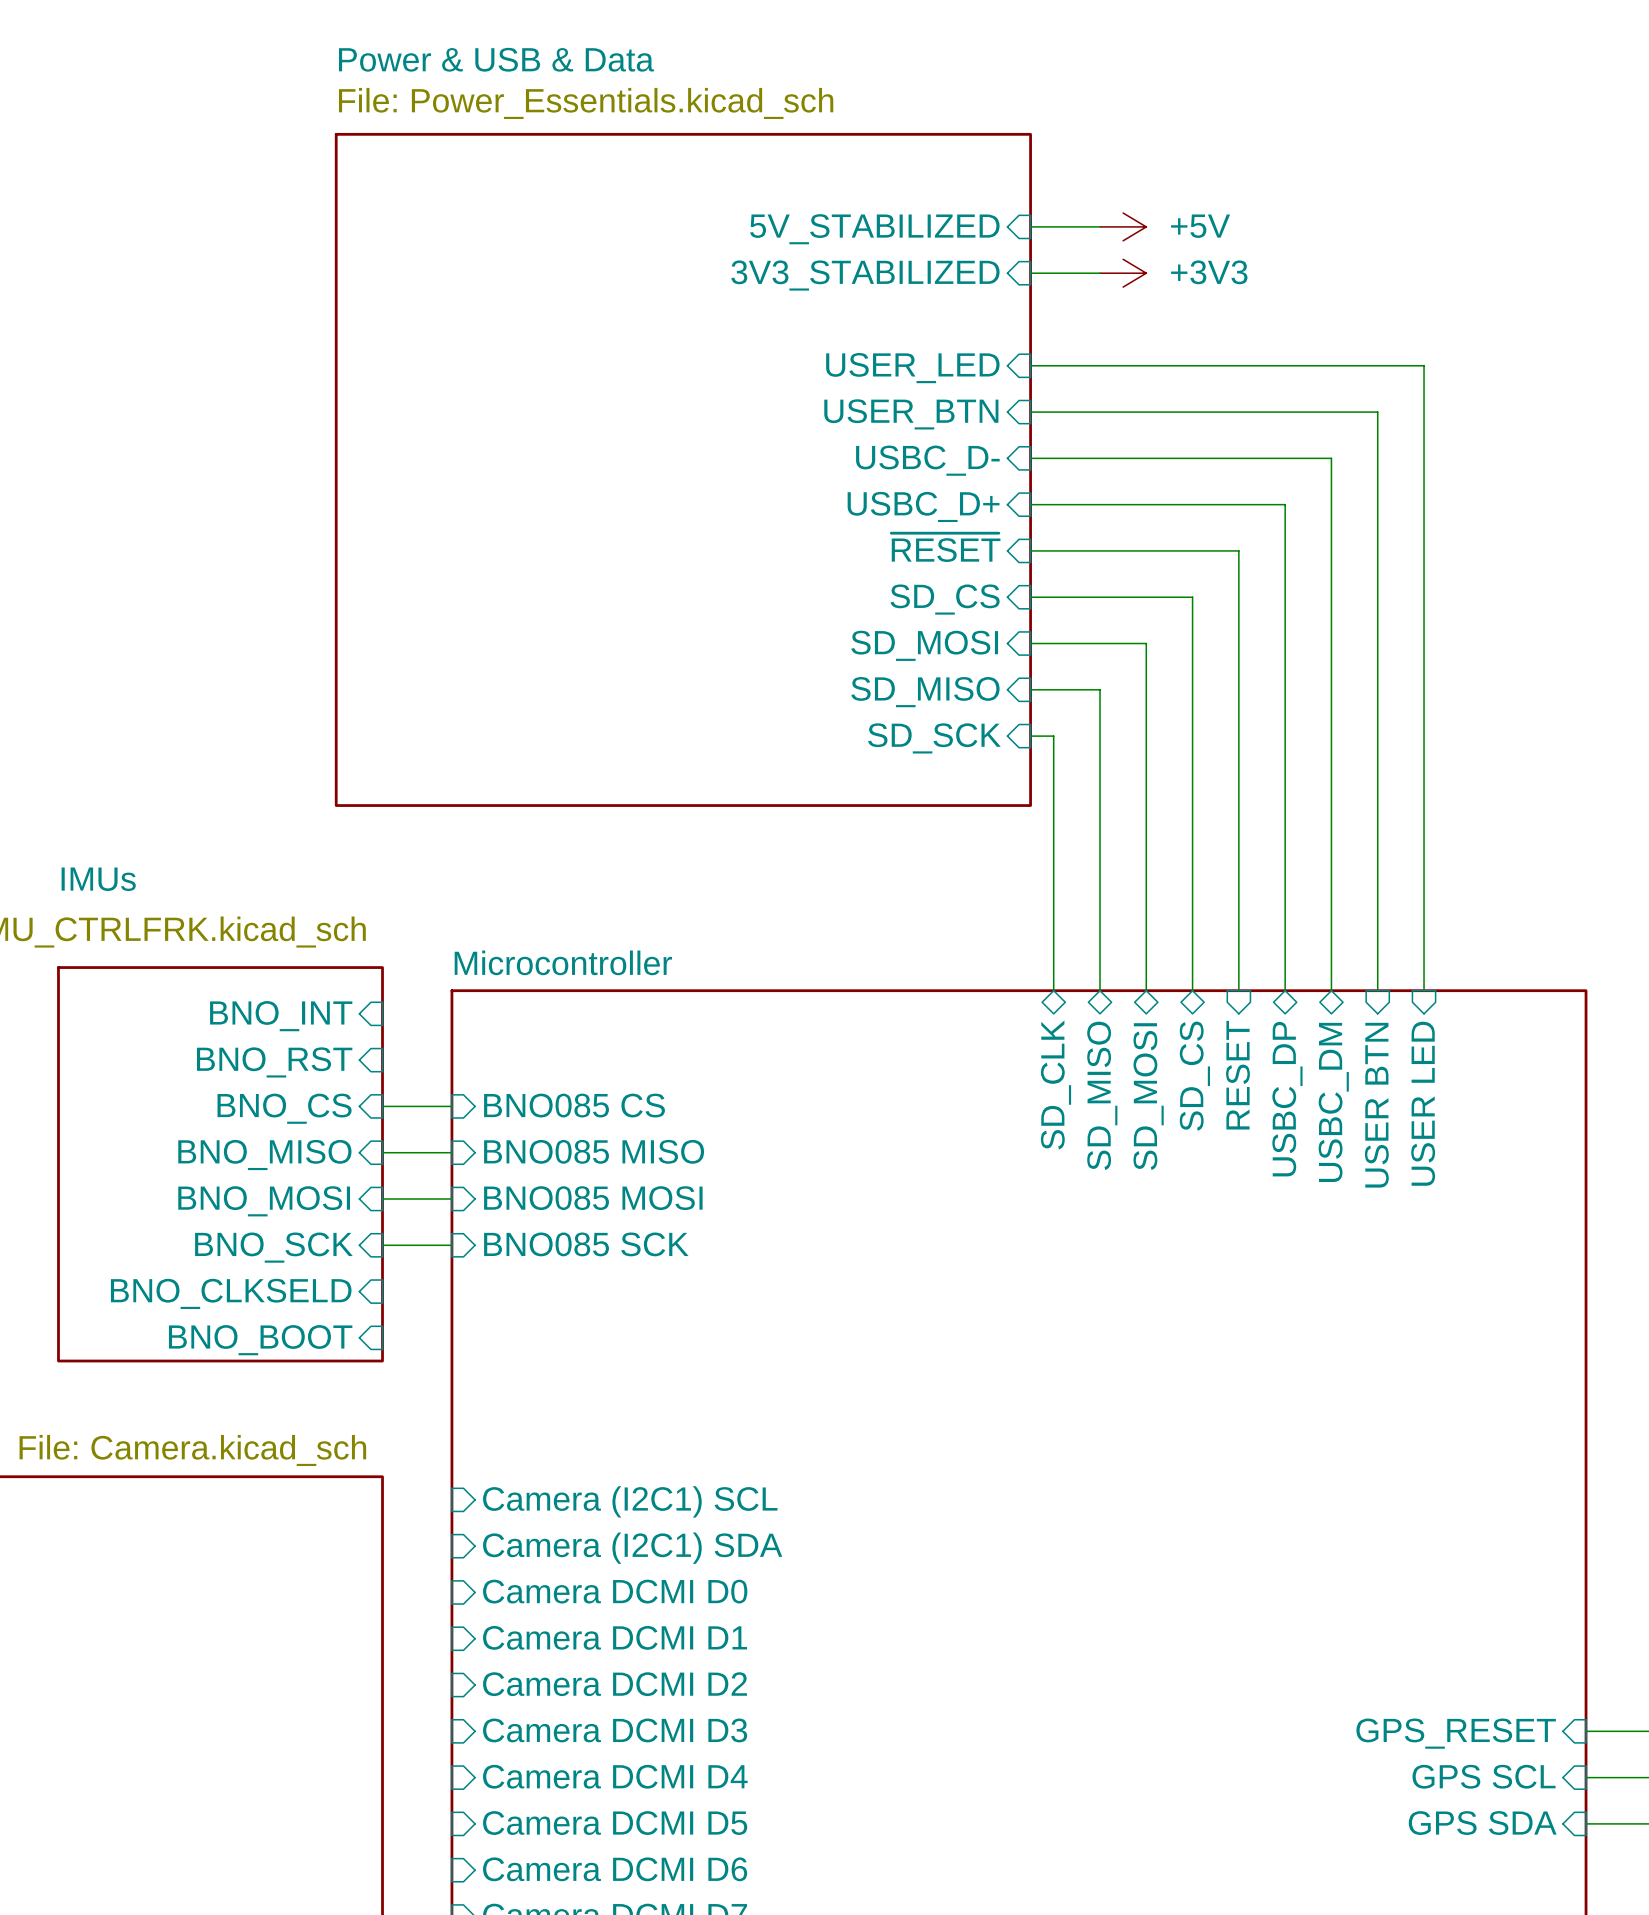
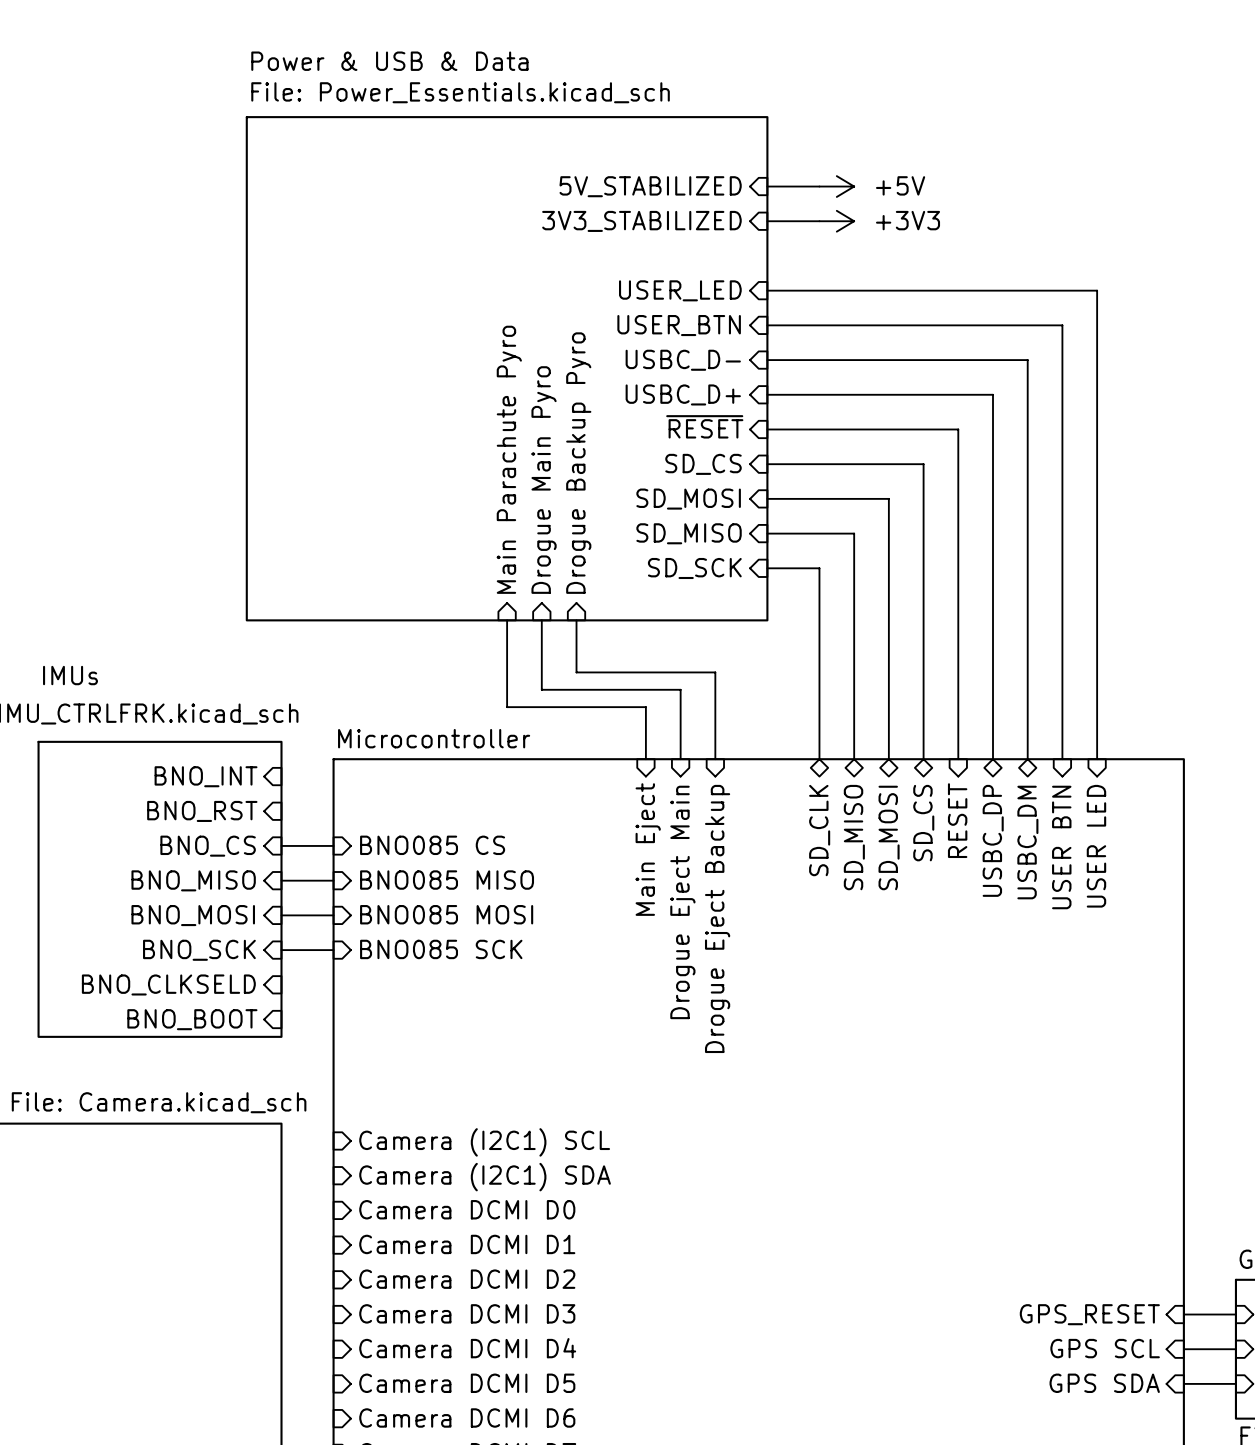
wire: (1424, 365) (1424, 412) -> (1027, 325) (1062, 325)
wire: none -> (1062, 290) (1097, 290) (1097, 759)
wire: (1377, 412) (1377, 458) -> (993, 360) (1027, 360)
wire: (1331, 458) (1331, 504) -> (958, 394) (993, 394)
wire: (1285, 504) (1285, 550) -> (923, 429) (958, 429)
wire: (1238, 550) (1238, 597) -> (888, 464) (923, 464)
wire: (1192, 597) (1192, 643) -> (854, 498) (888, 498)
sheet pin: none -> Main Parachute Pyro (509, 459)
sheet pin: none -> Drogue Backup Pyro (578, 463)
sheet pin: none -> Drogue Main Pyro (544, 480)
wire: (1146, 643) (1146, 689) -> (819, 533) (854, 533)
wire: (1099, 689) (1099, 736) -> (784, 568) (819, 568)
wire: (1053, 736) (1053, 990) -> none
wire: none -> (507, 620) (507, 707) (645, 707) (645, 759)
wire: none -> (541, 620) (541, 689) (680, 689) (680, 759)
wire: none -> (576, 620) (576, 672) (715, 672) (715, 759)
sheet pin shape: input (1237, 1075) -> bidirectional (923, 823)
sheet pin: RESET (1237, 1075) -> SD_CS (923, 823)
sheet pin: SD_CS (1194, 1076) -> SD_MOSI (889, 837)
sheet pin: SD_CLK (1056, 1084) -> none
sheet pin: SD_MISO (1102, 1095) -> SD_CLK (819, 830)
sheet pin: SD_MOSI (1148, 1096) -> SD_MISO (854, 837)
sheet pin: none -> Main Eject (648, 849)
sheet pin shape: bidirectional (1287, 1099) -> input (957, 820)
sheet pin: USBC_DP (1287, 1099) -> RESET (957, 820)
sheet pin: USBC_DM (1333, 1102) -> USBC_DP (993, 840)
sheet pin: USER LED (1423, 1103) -> USER BTN (1061, 847)
sheet pin: none -> USER LED (1096, 846)
sheet pin shape: input (1376, 1105) -> bidirectional (1027, 842)
sheet pin: USER BTN (1376, 1105) -> USBC_DM (1027, 842)
sheet pin: none -> Drogue Eject Main (682, 902)
sheet pin: none -> Drogue Eject Backup (717, 918)

